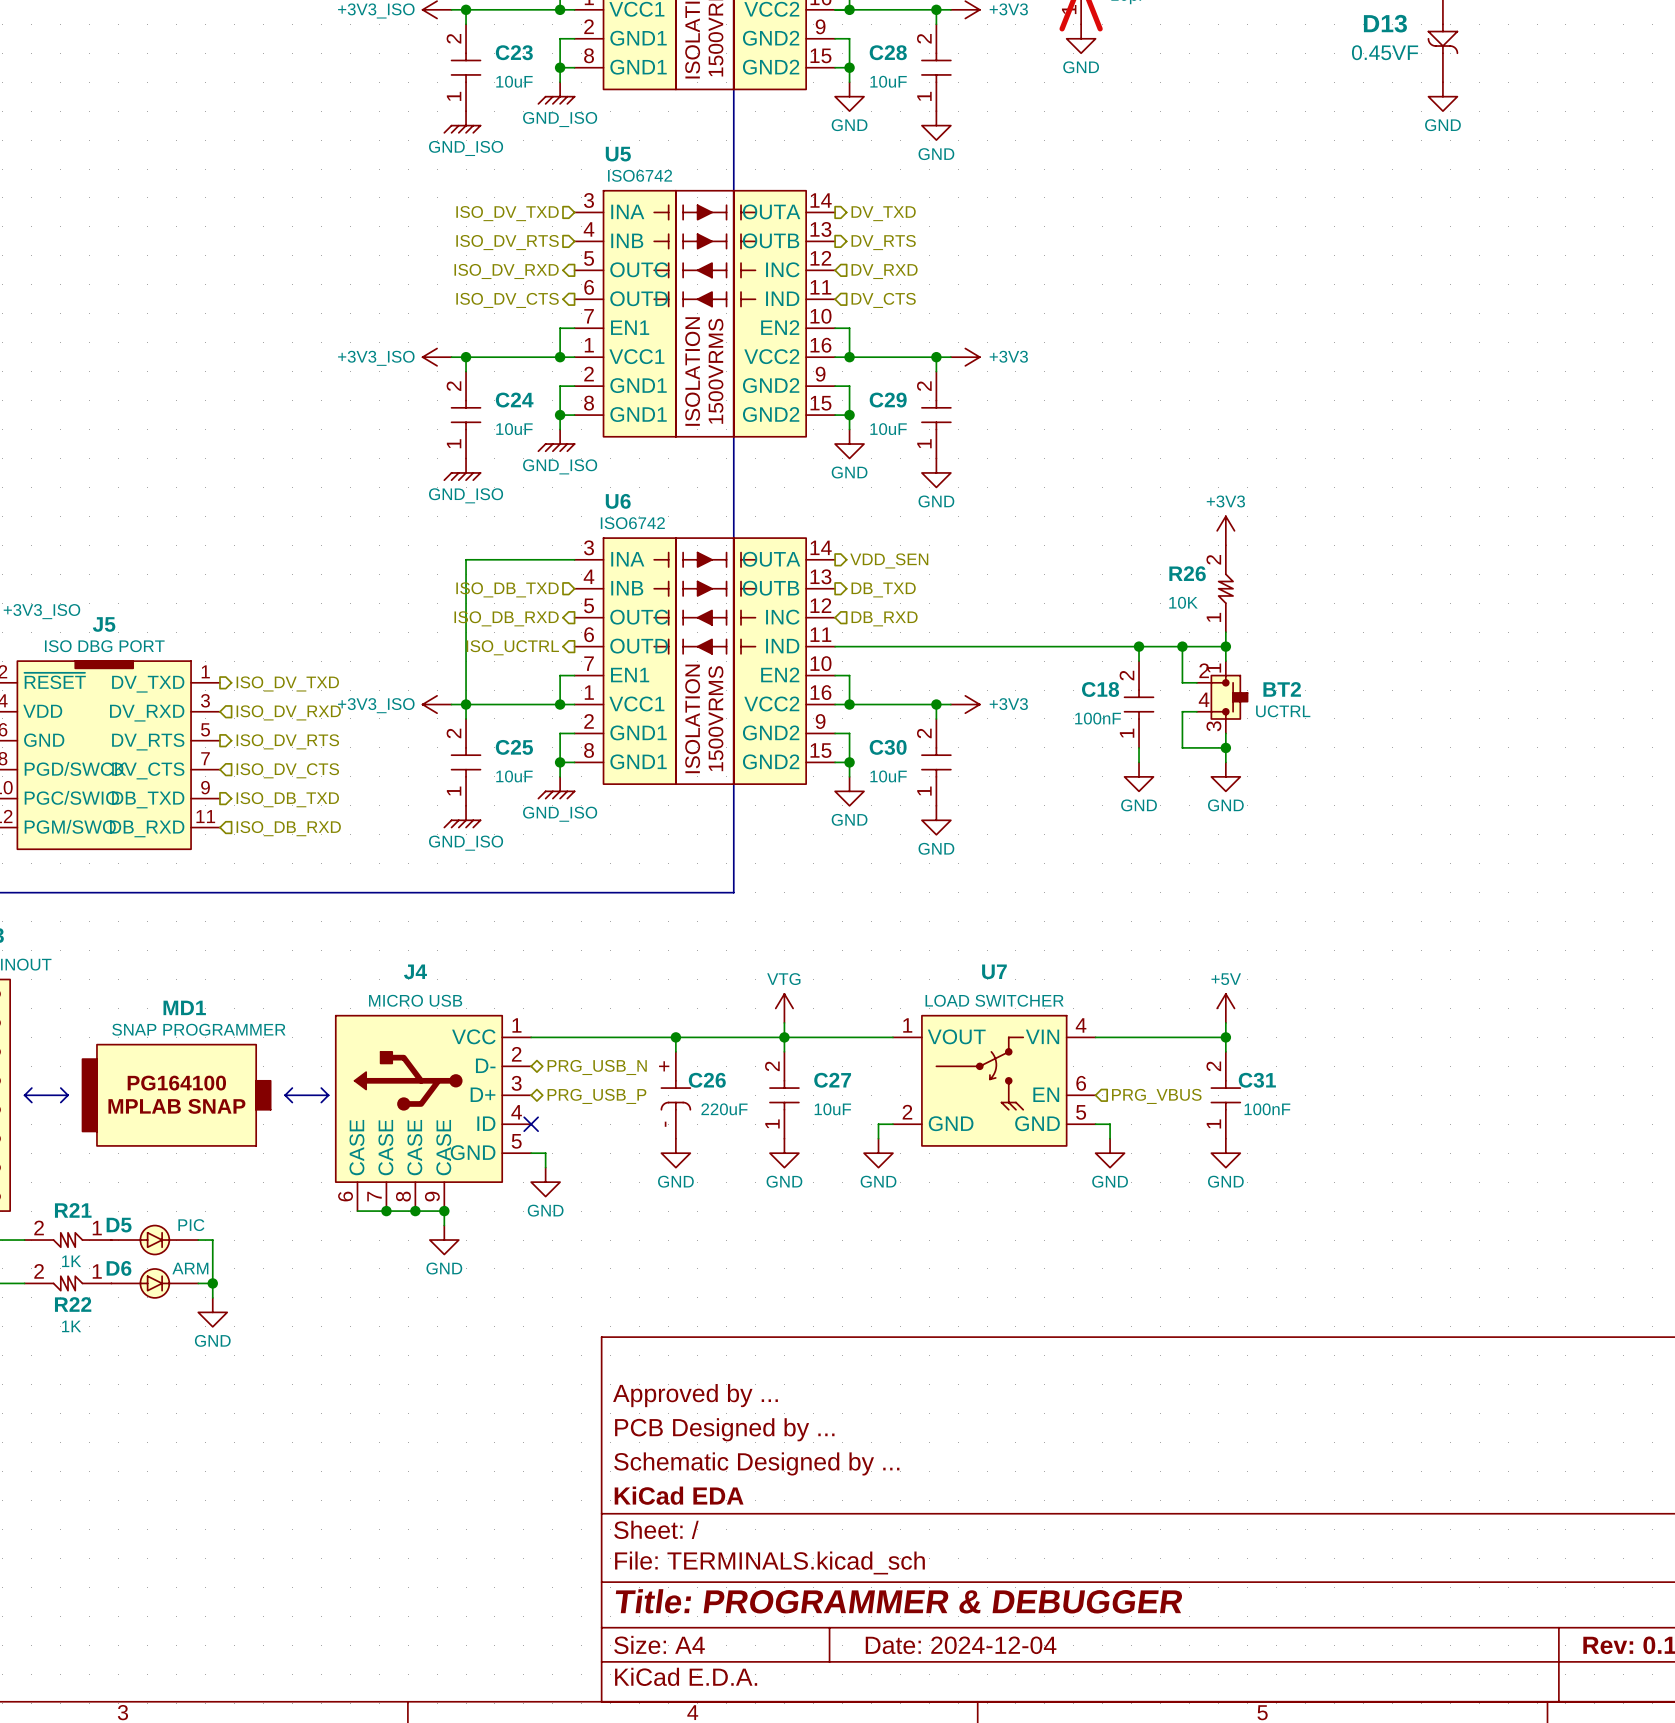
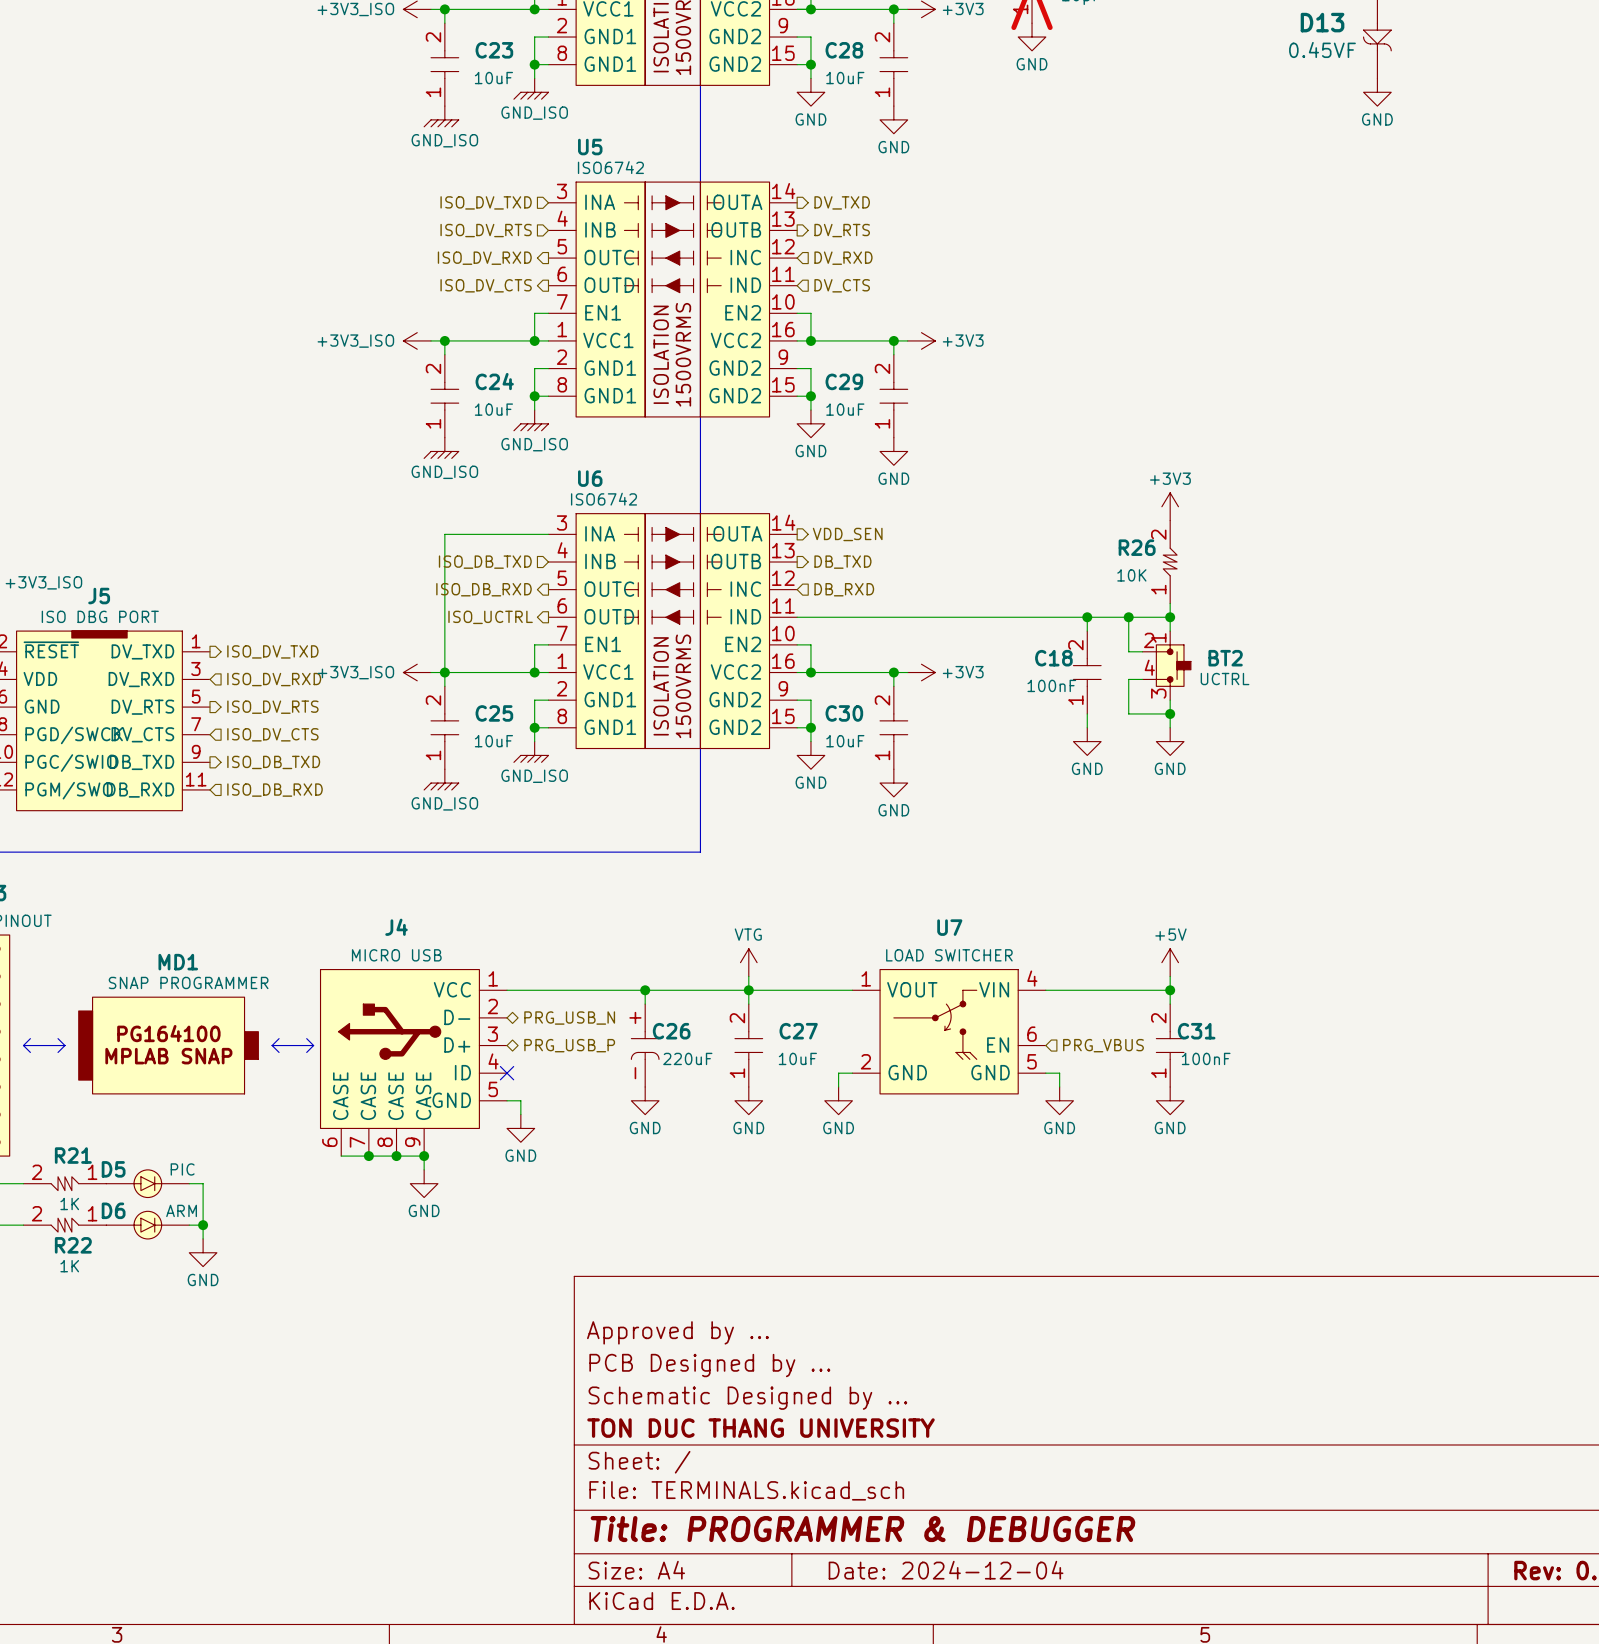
title block: KiCad EDA (679, 1495) -> TON DUC THANG UNIVERSITY (761, 1428)

